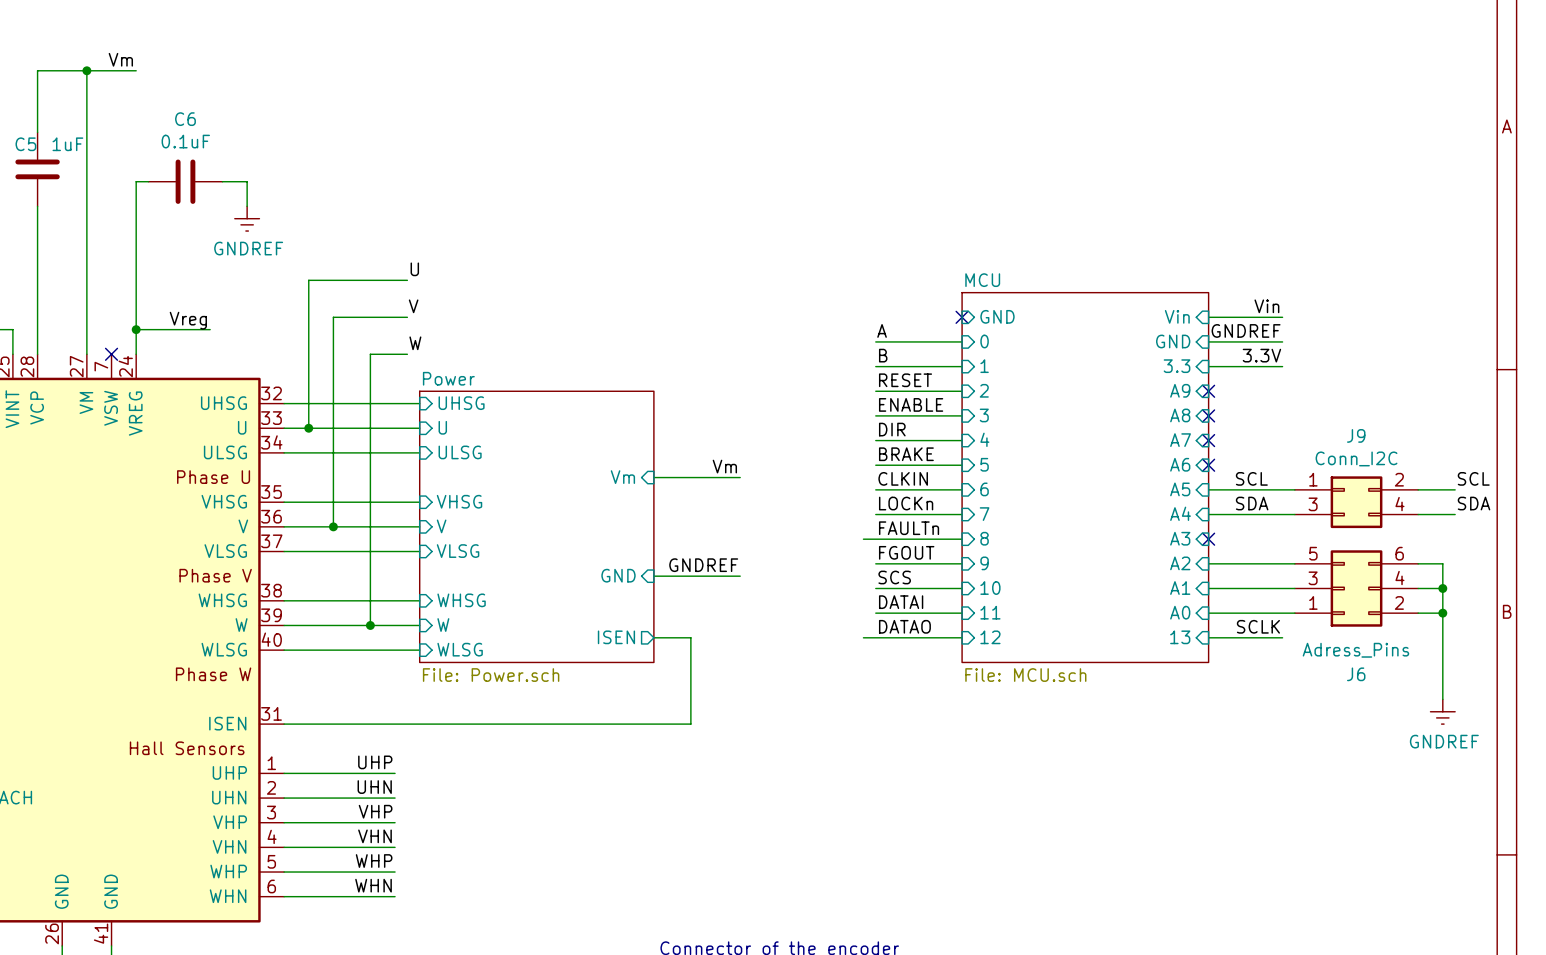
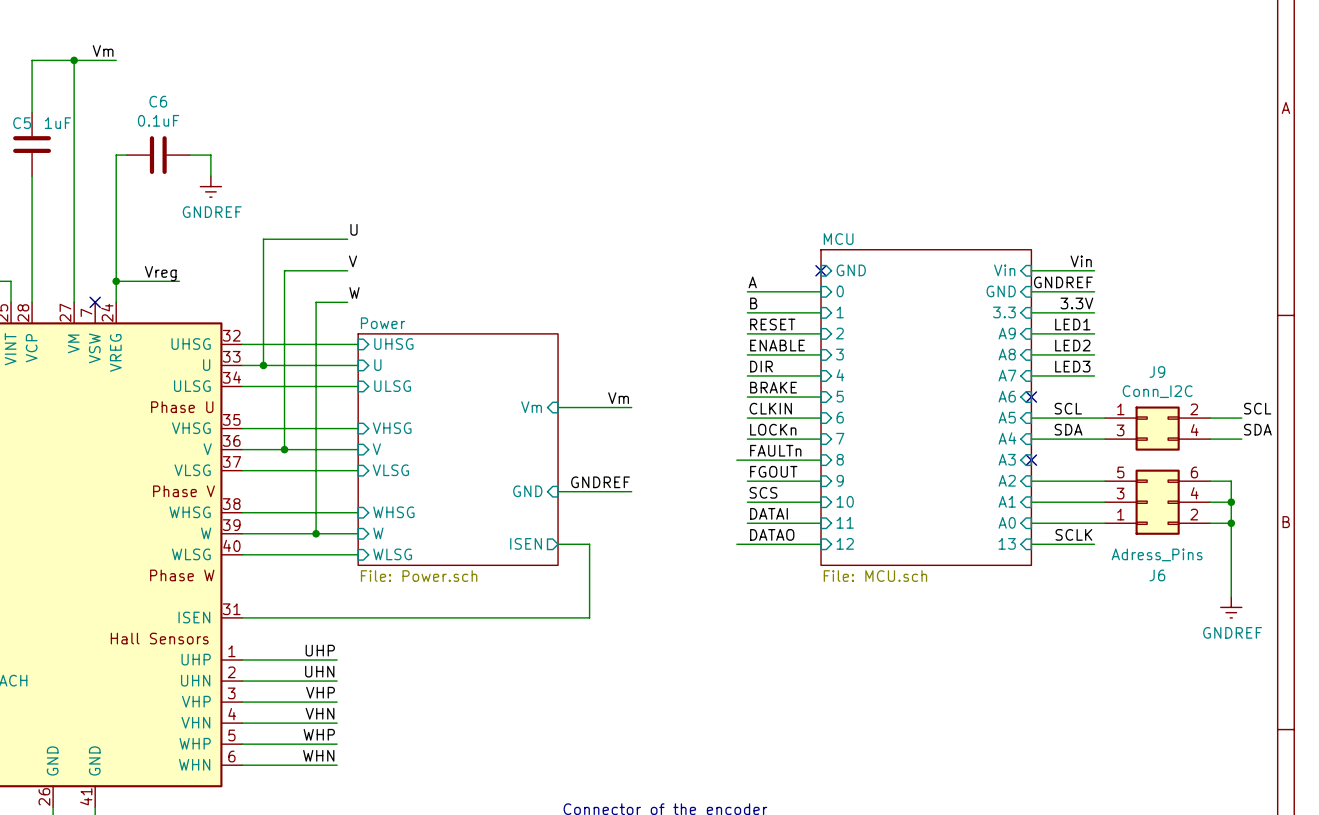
label: none -> LED1 (1072, 324)
wire: none -> (1031, 333) (1094, 333)
no-connect mark: (1208, 391) -> none
label: none -> LED2 (1072, 345)
wire: none -> (1031, 354) (1094, 354)
no-connect mark: (1208, 415) -> none
label: none -> LED3 (1072, 366)
wire: none -> (1031, 375) (1094, 375)
no-connect mark: (1208, 440) -> none

